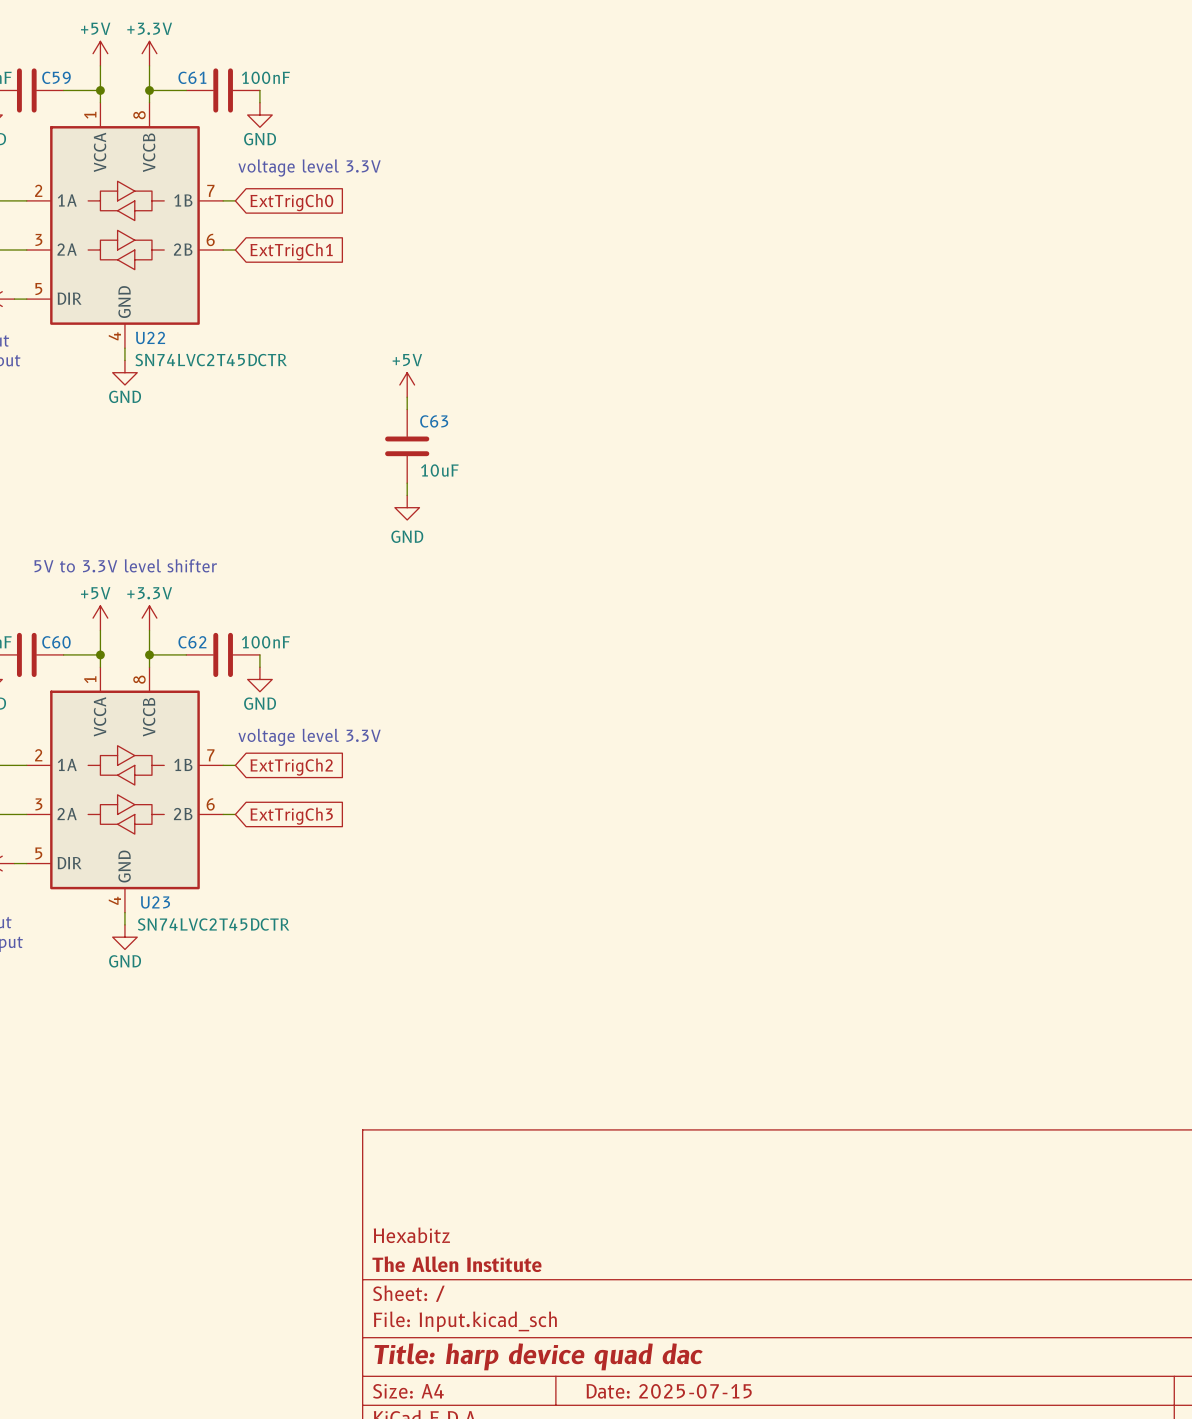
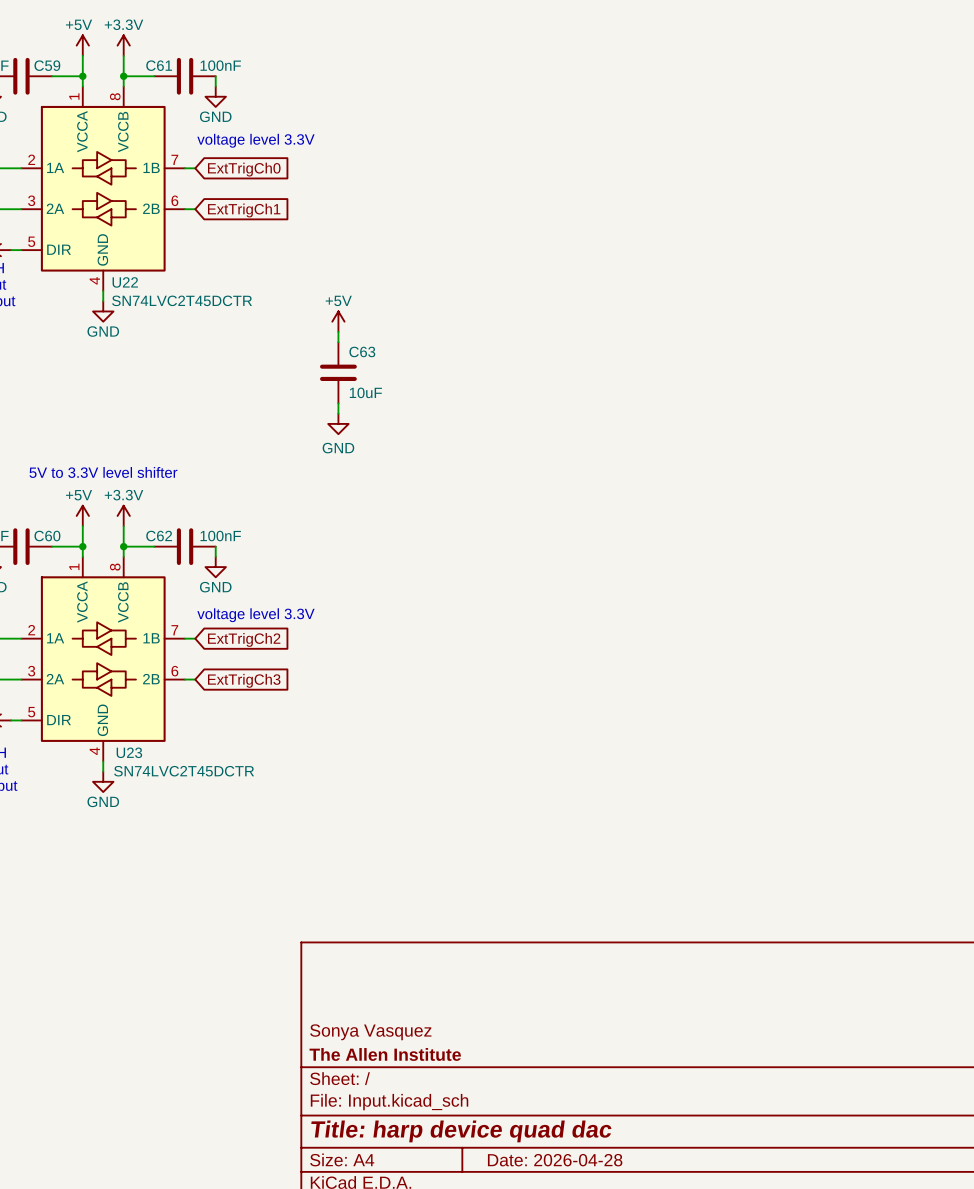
title block: Hexabitz (411, 1235) -> Sonya Vasquez (370, 1032)
title block: Date: 2025-07-15 (669, 1391) -> Date: 2026-04-28 (555, 1160)

